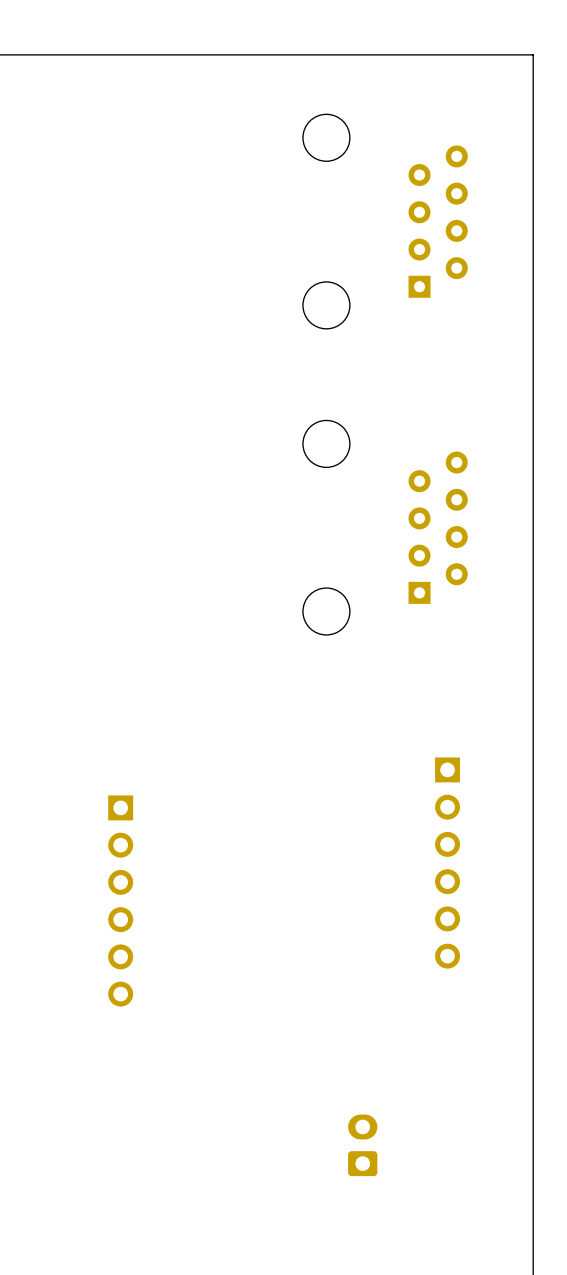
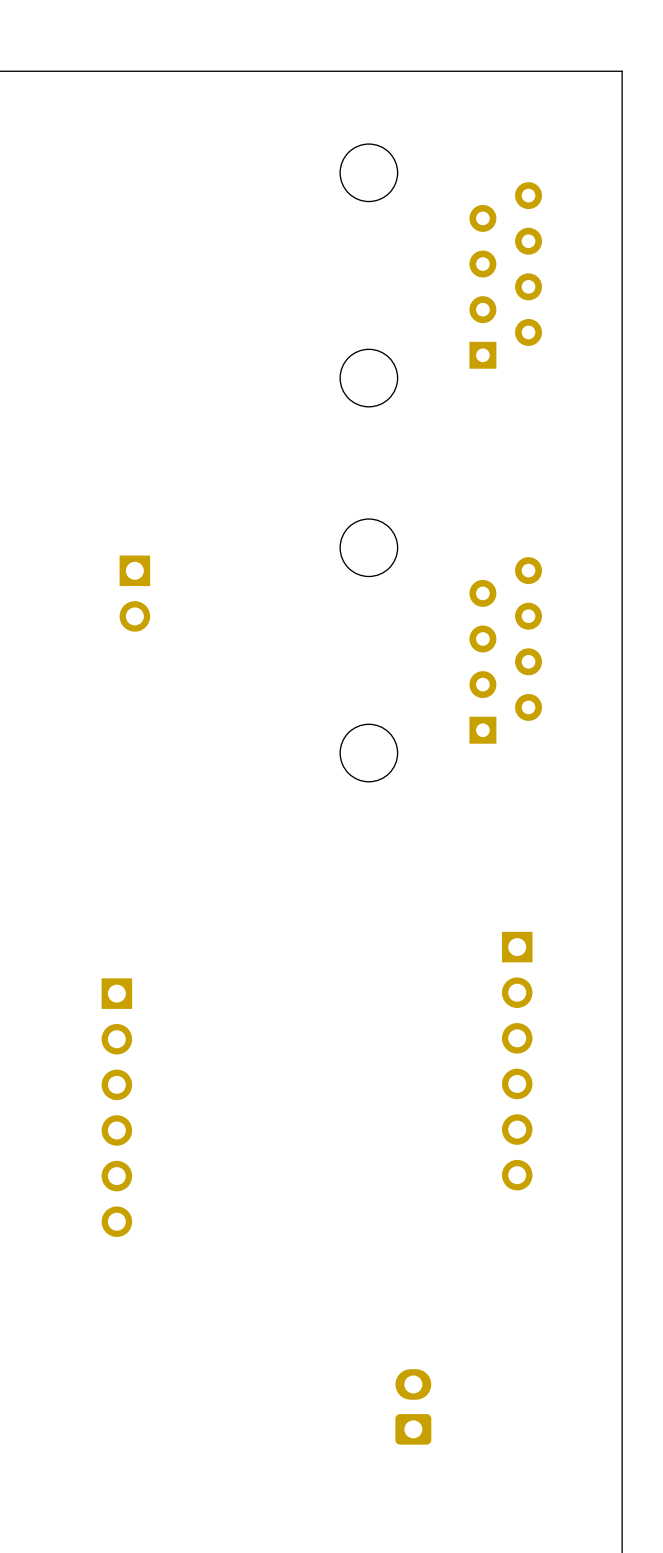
part: none -> (134, 593)

